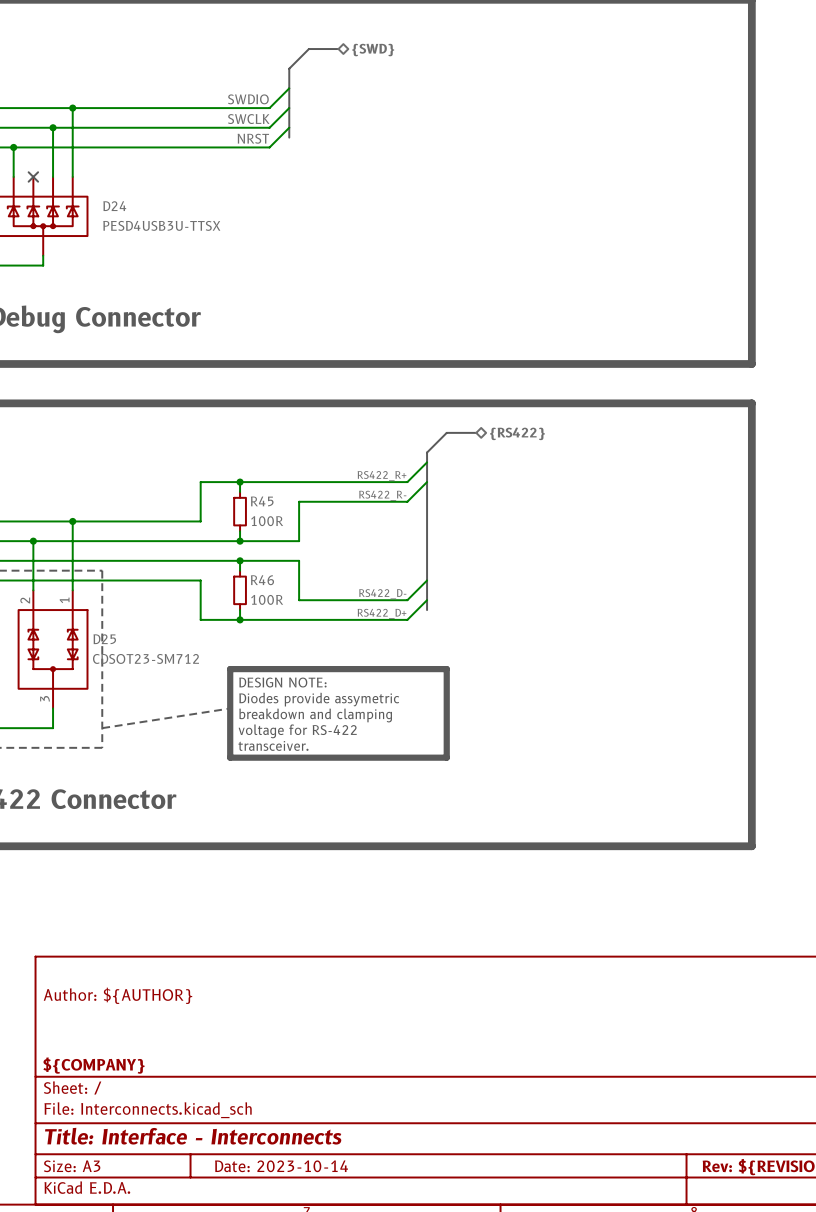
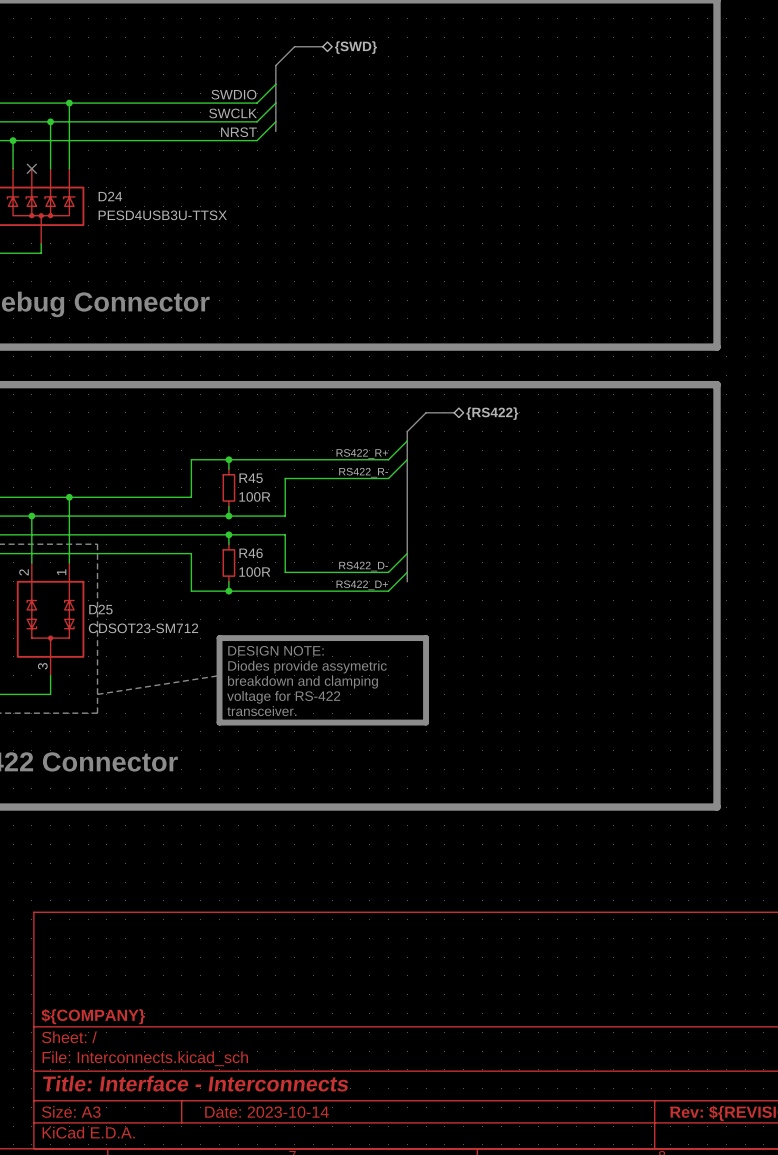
title block: Author: ${AUTHOR} (117, 995) -> none

